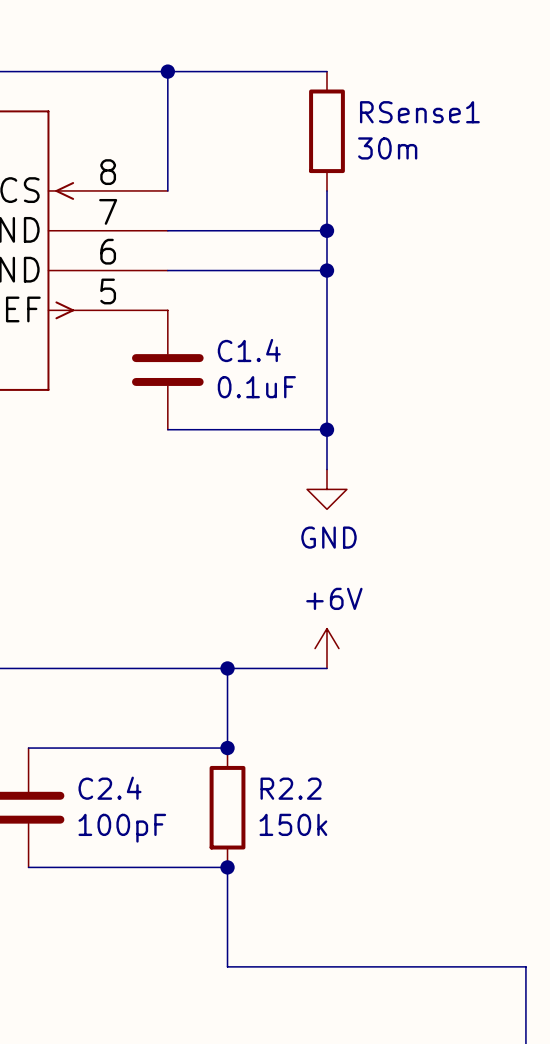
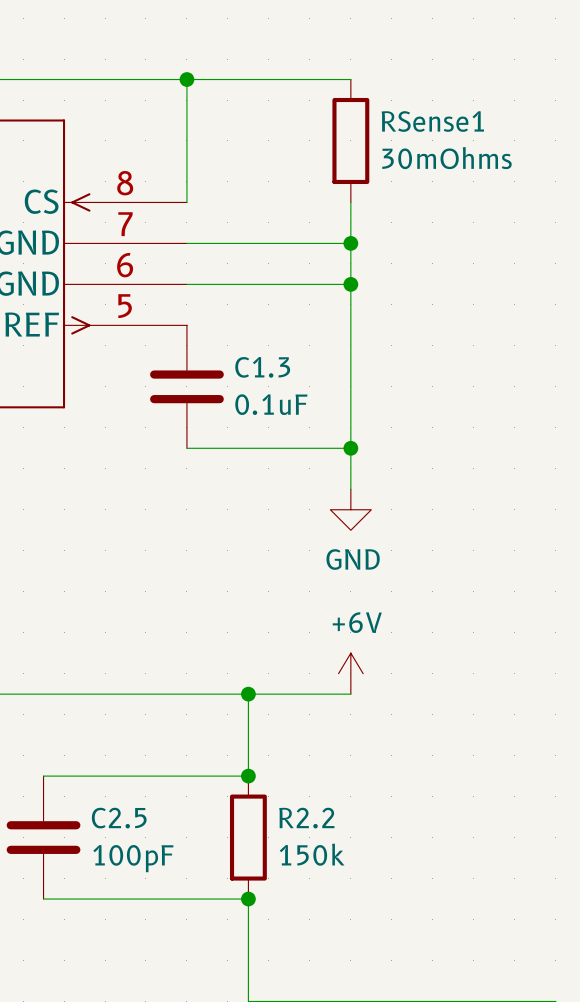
RSense1 value: 30m (387, 148) -> 30mOhms (446, 158)
C1.4 name: C1.4 (249, 350) -> C1.3 (262, 367)
C2.4 name: C2.4 (110, 788) -> C2.5 (119, 818)

